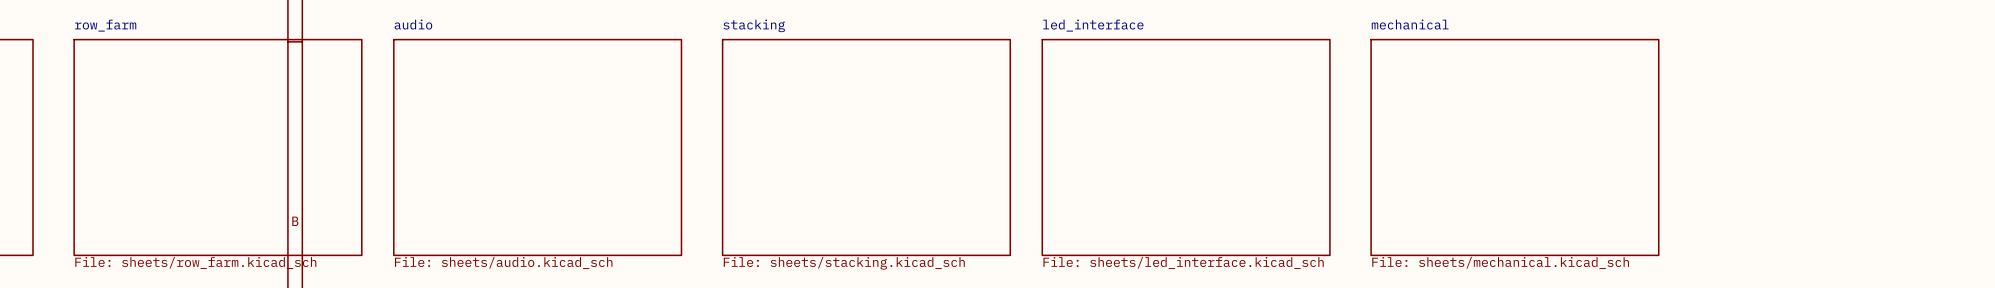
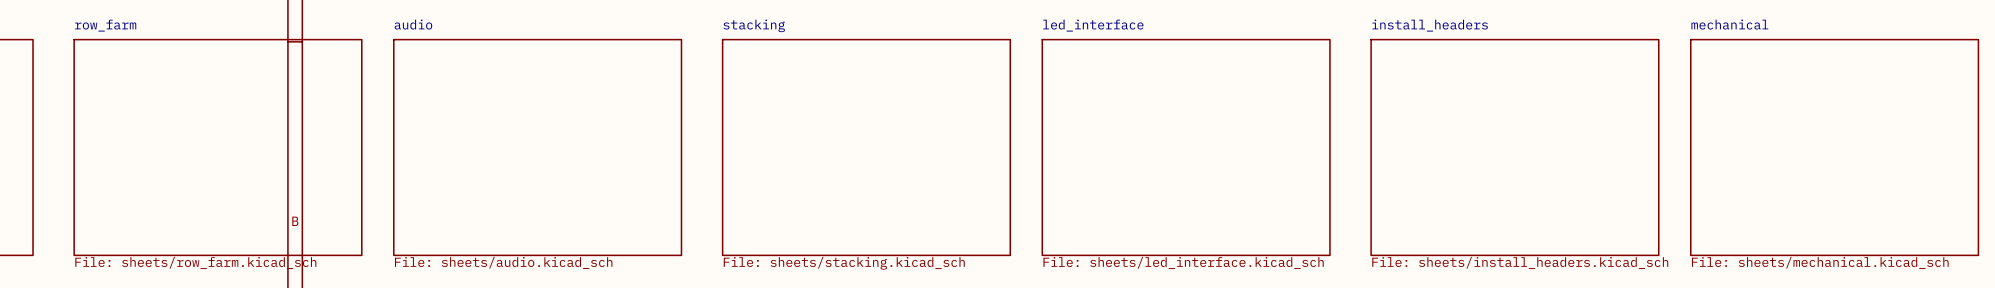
sheet mechanical name: mechanical (1410, 24) -> install_headers (1430, 25)
sheet mechanical: none -> File: sheets/mechanical.kicad_sch (1834, 147)
sheet mechanical value: File: sheets/mechanical.kicad_sch (1500, 262) -> File: sheets/install_headers.kicad_sch (1520, 262)

